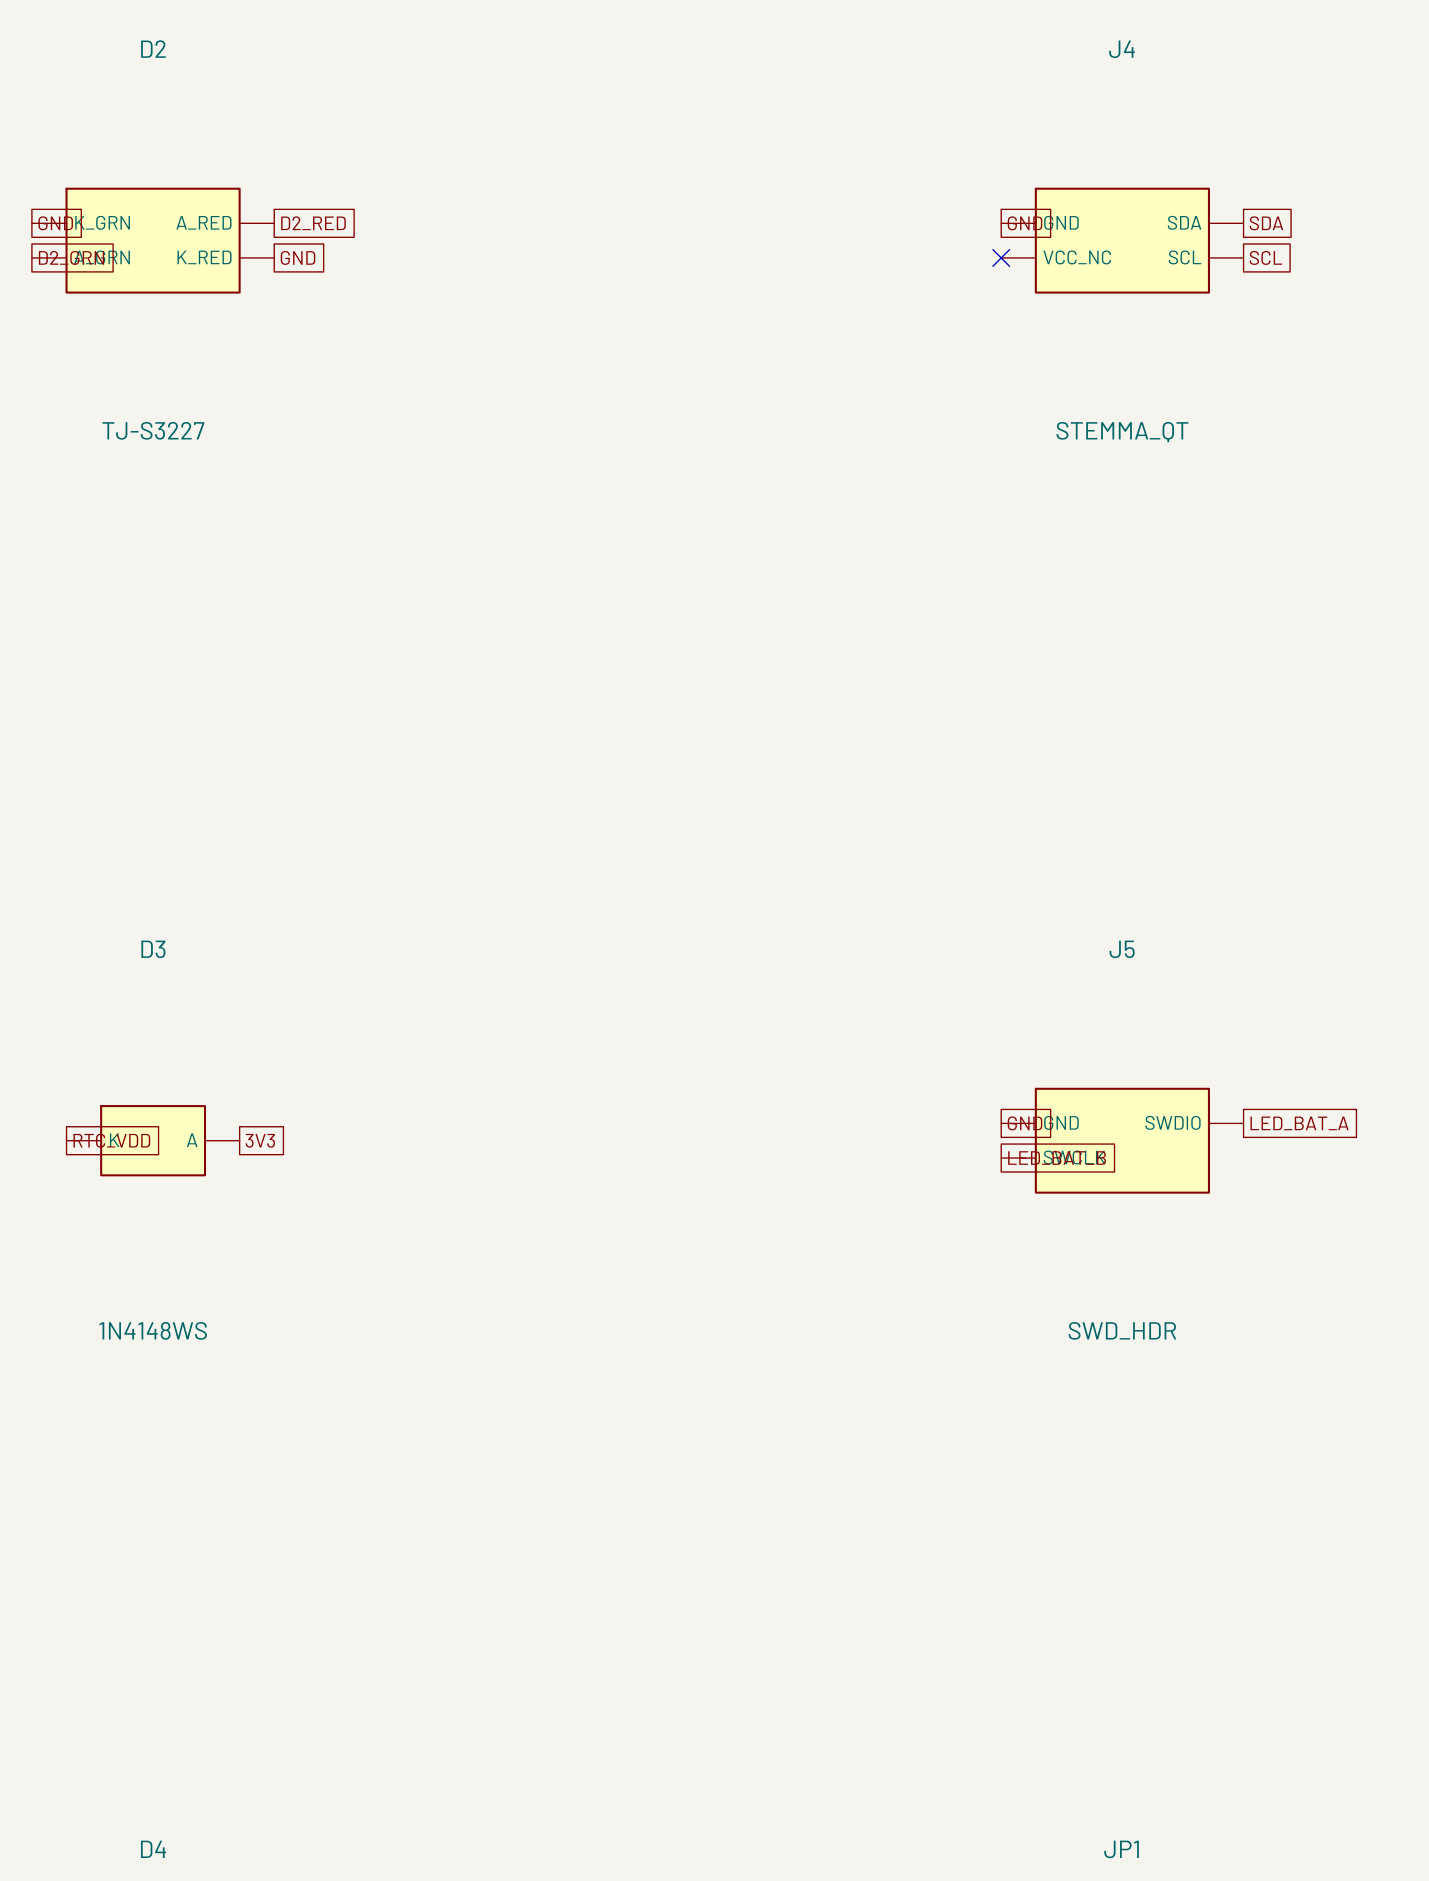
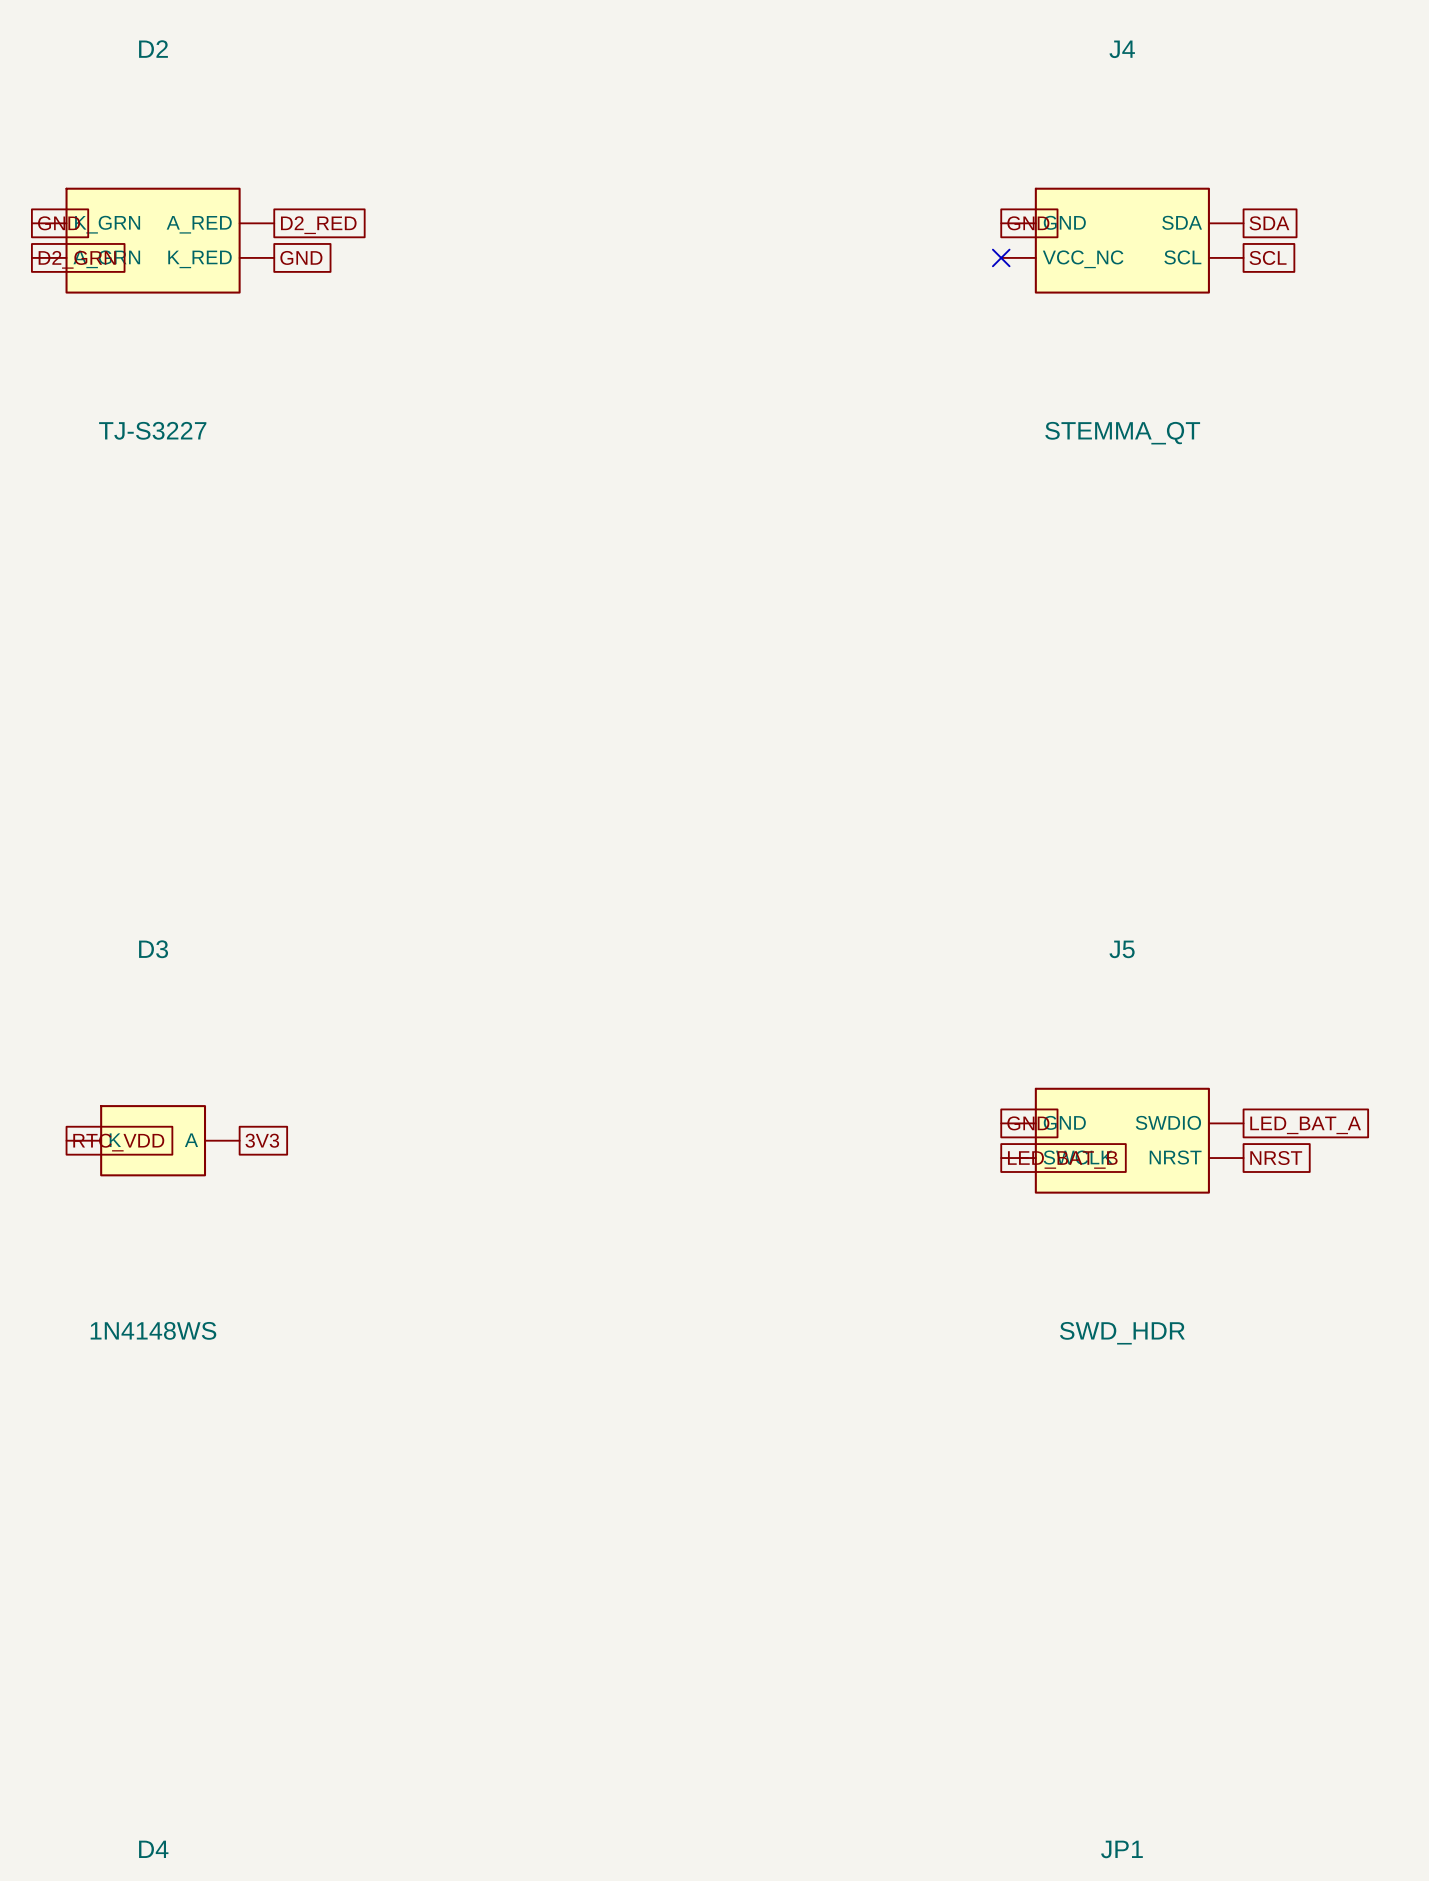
J5 symbol: [1001, 1087, 1244, 1194] -> [1001, 1087, 1244, 1194]
global label: none -> NRST (1276, 1158)

